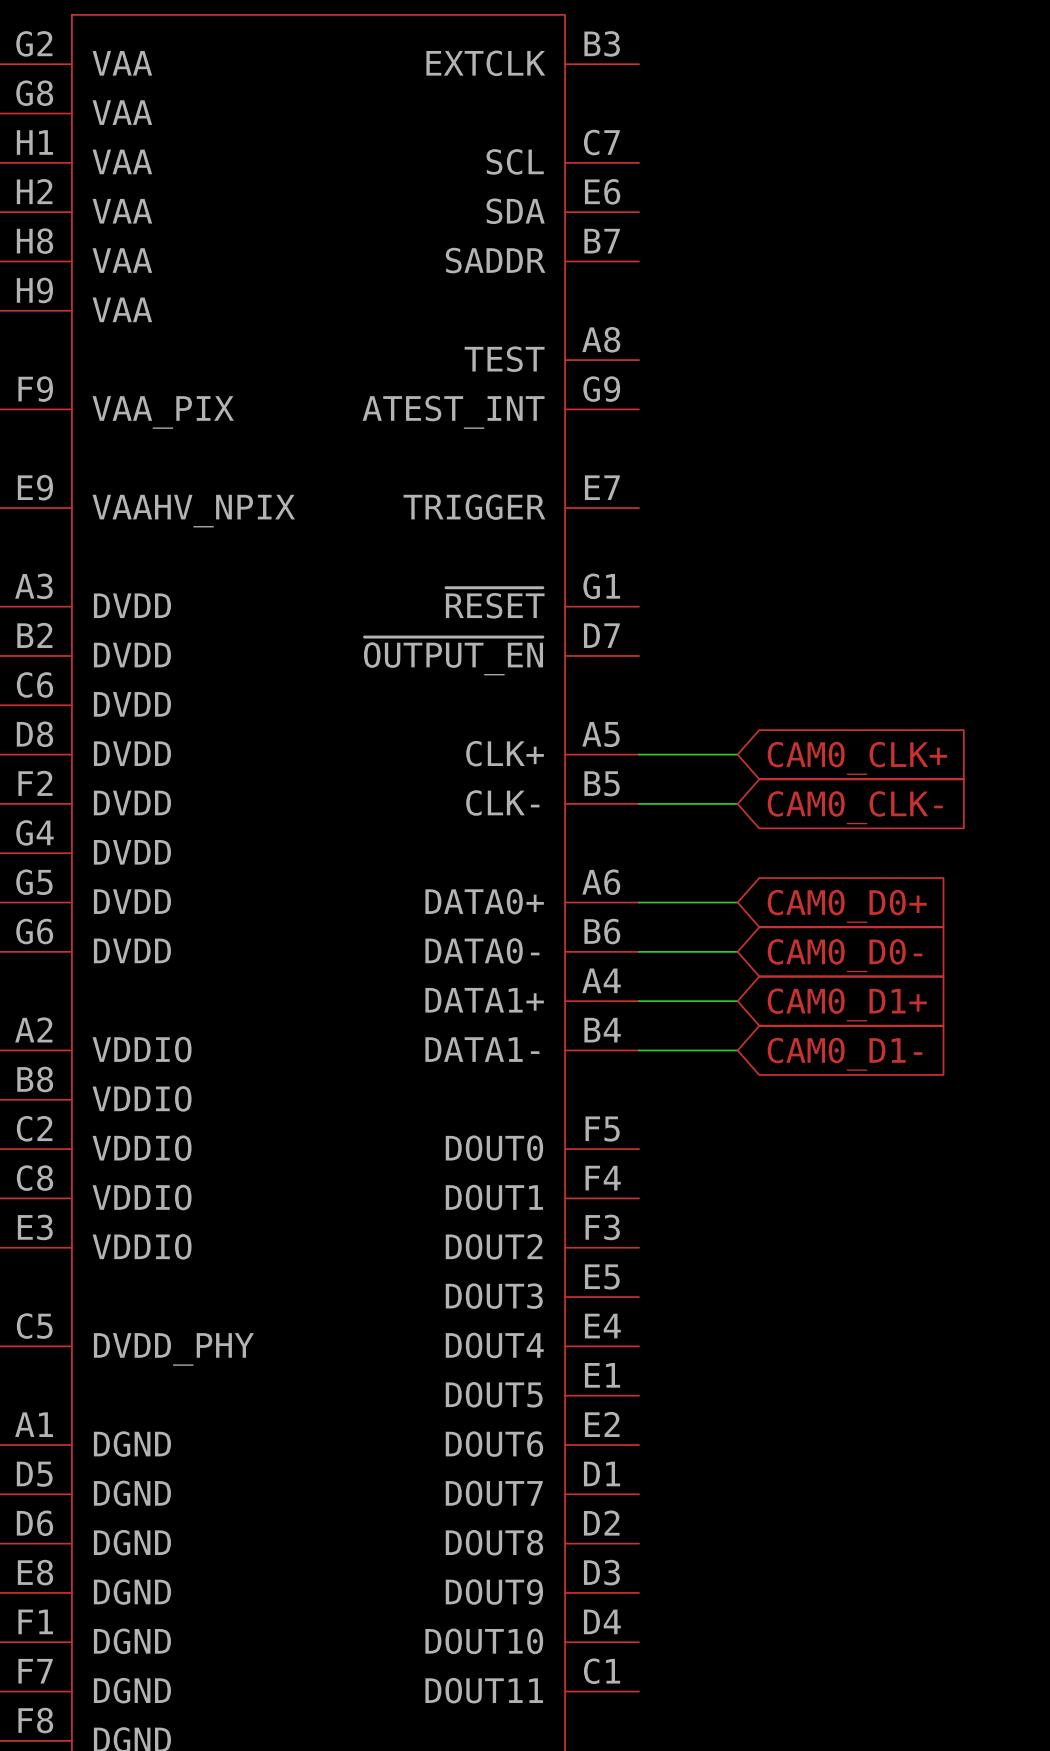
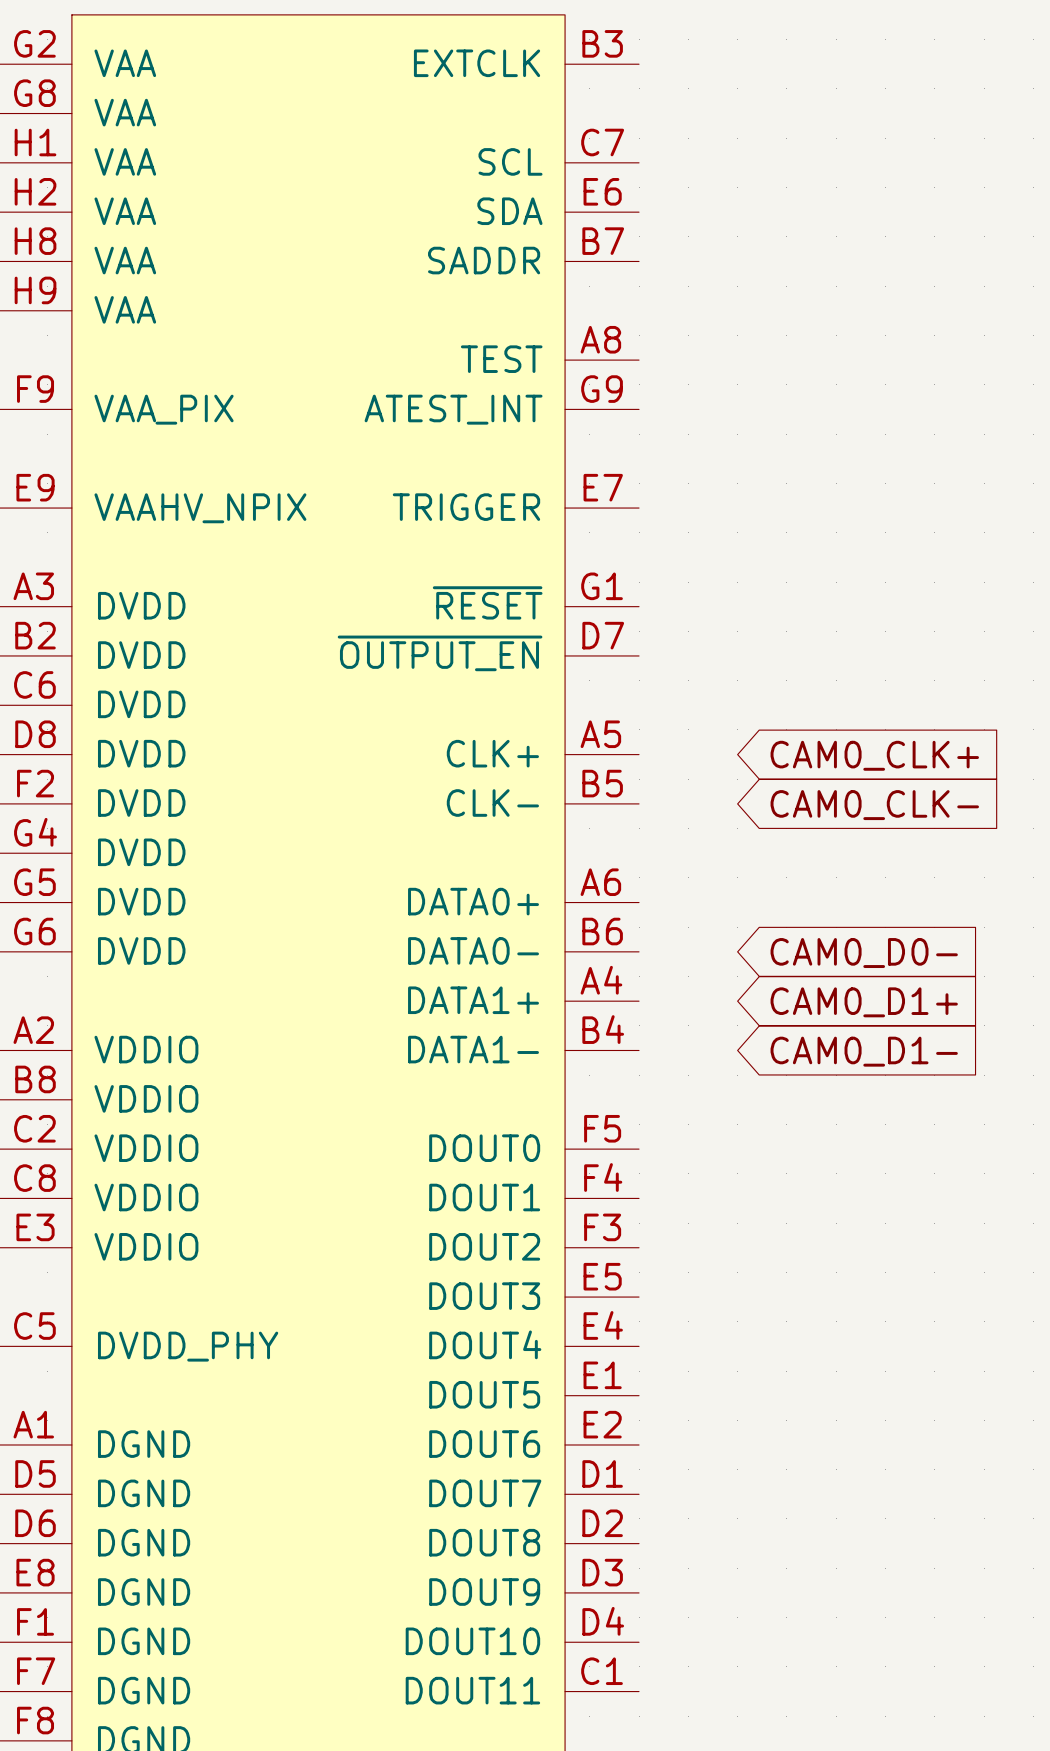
wire: (639, 754) (737, 754) -> none
wire: (639, 803) (737, 803) -> none
wire: (639, 902) (737, 902) -> none
global label: CAM0_D0+ (847, 906) -> none
wire: (639, 951) (737, 951) -> none
wire: (639, 1001) (737, 1001) -> none
wire: (639, 1050) (737, 1050) -> none

